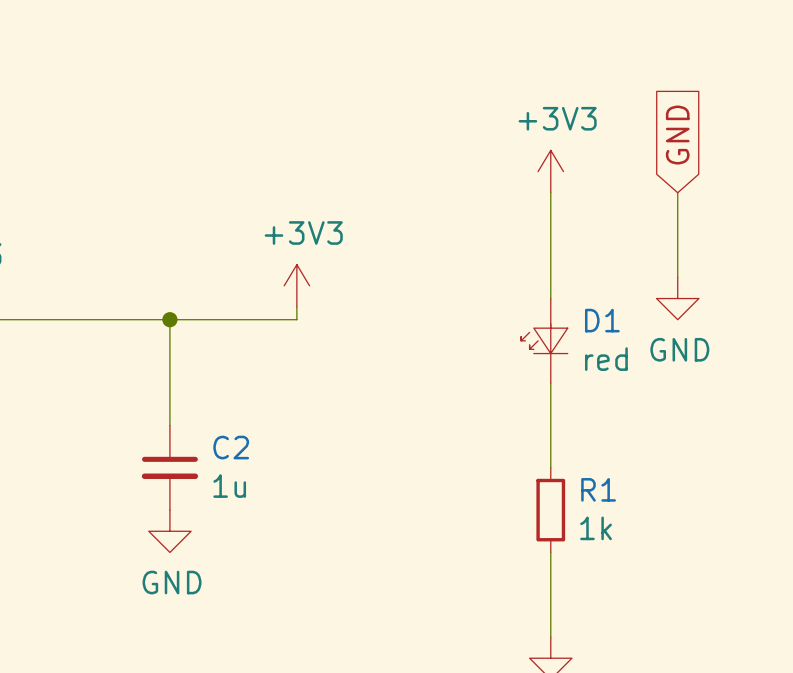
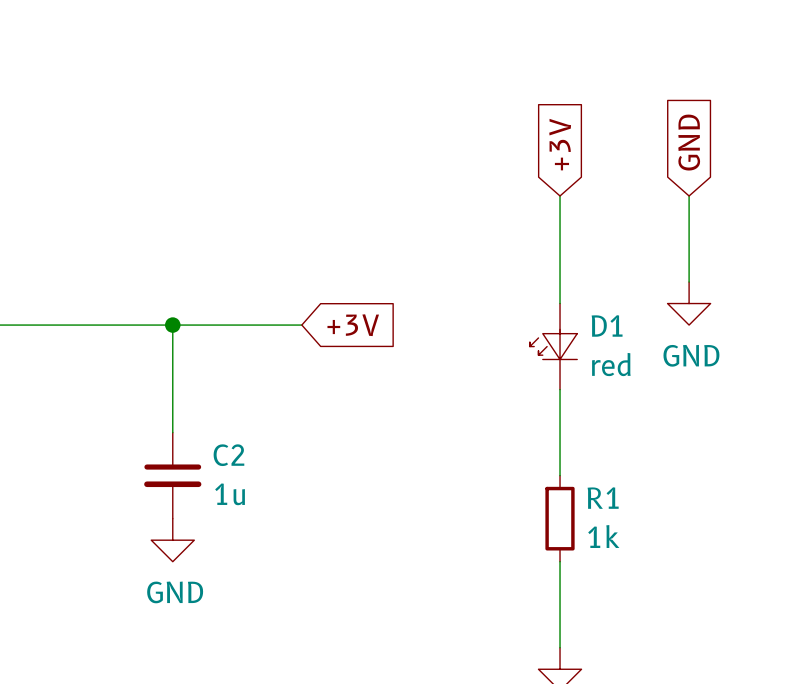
global label: none -> +3V (560, 144)
power symbol: +3V3 (550, 171) -> none
power symbol: +3V3 (296, 285) -> none
wire: (296, 307) (296, 319) -> none
global label: none -> +3V (353, 325)

